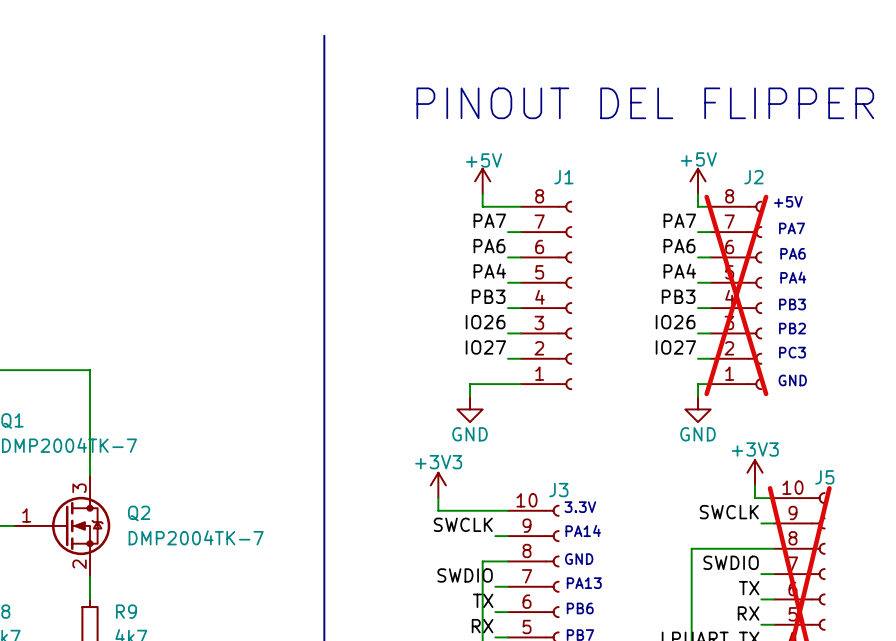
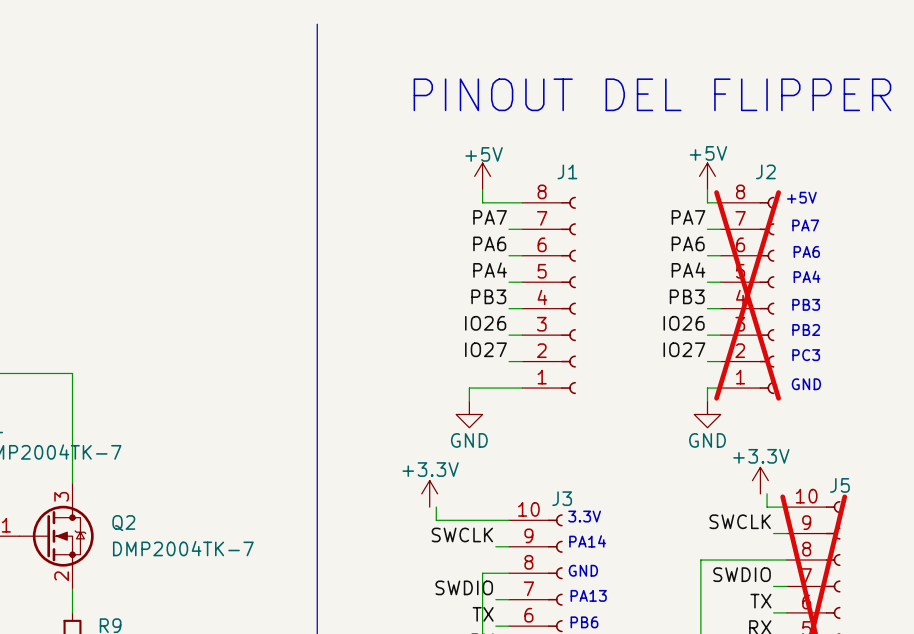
power symbol: +3V3 (755, 472) -> +3.3V (760, 480)
power symbol: +3V3 (438, 485) -> +3.3V (429, 493)

